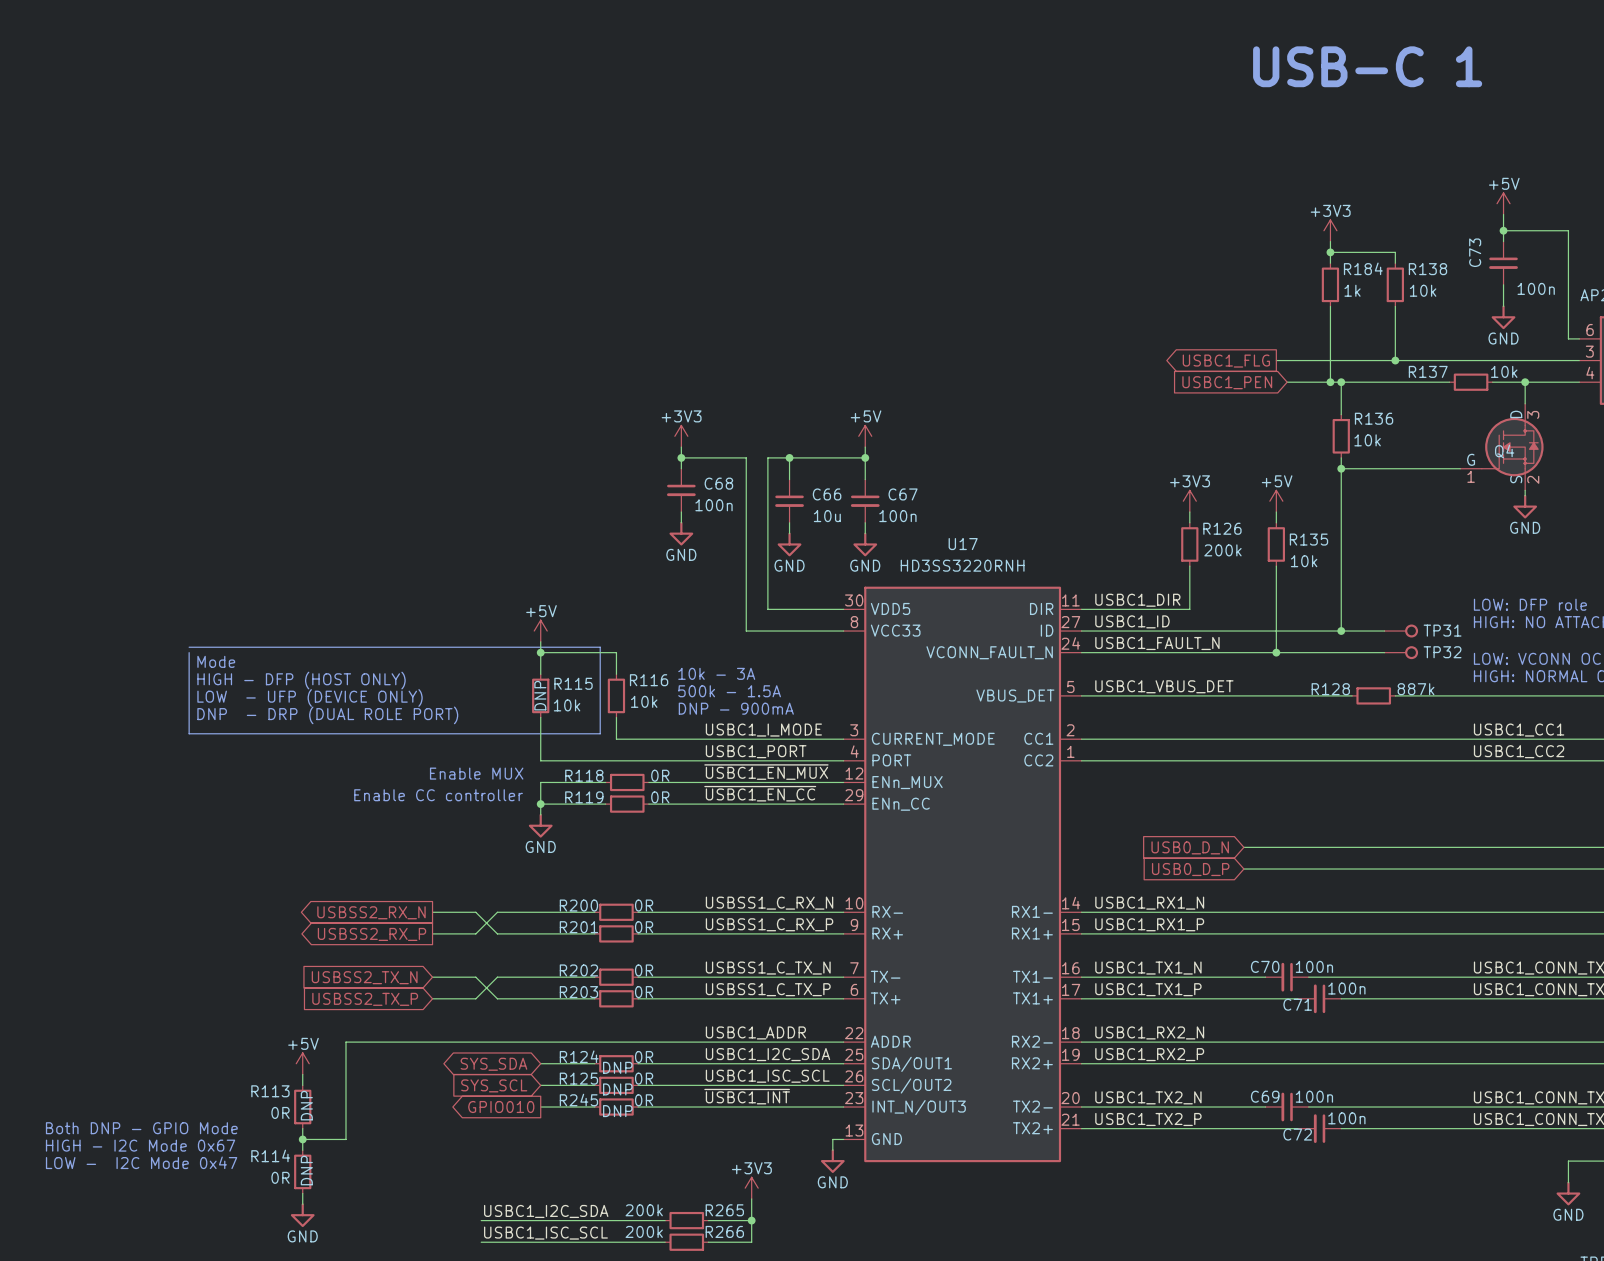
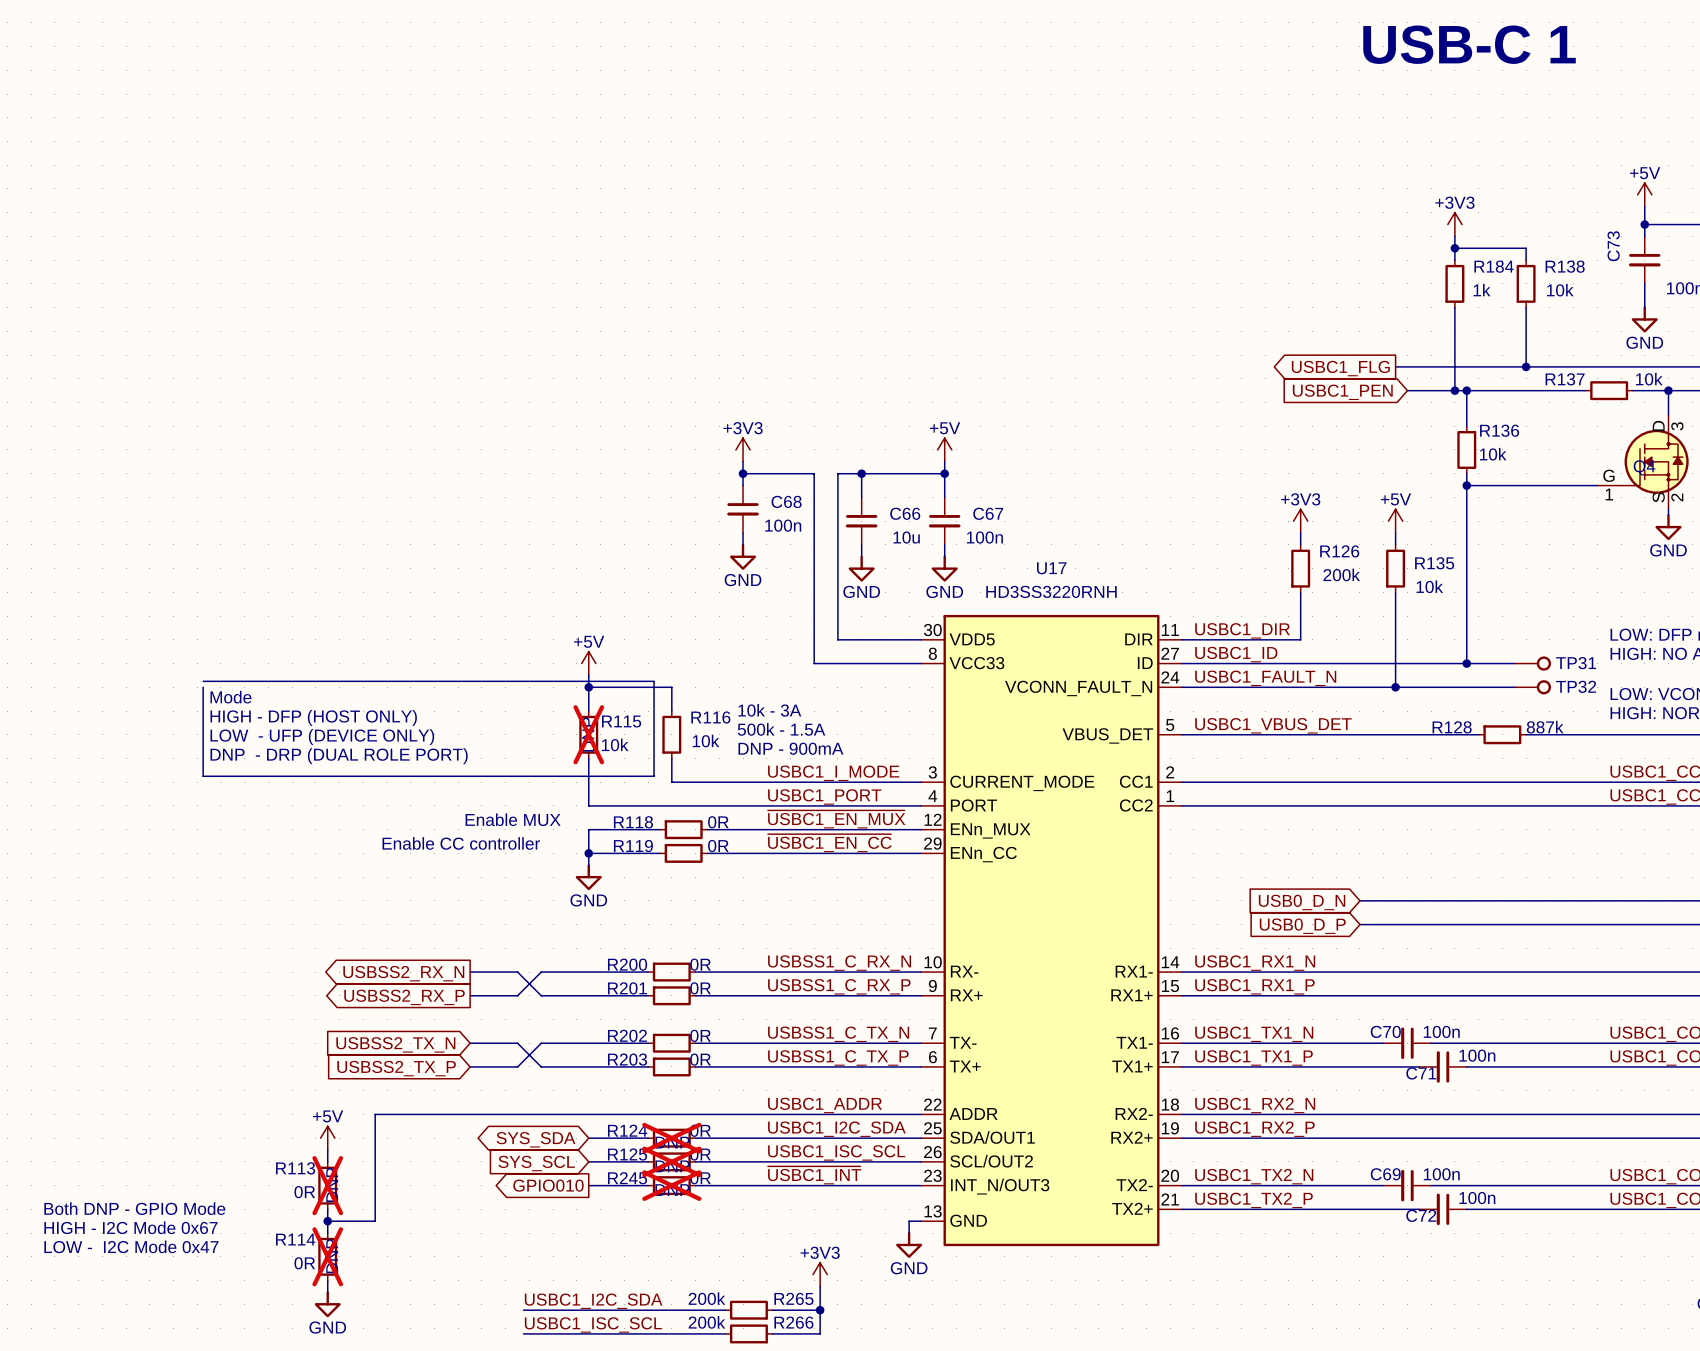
R115 do-not-place cross: none -> (588, 734)
R124 do-not-place cross: none -> (671, 1138)
R125 do-not-place cross: none -> (671, 1161)
R113 do-not-place cross: none -> (327, 1185)
R245 do-not-place cross: none -> (671, 1185)
R114 do-not-place cross: none -> (327, 1256)

